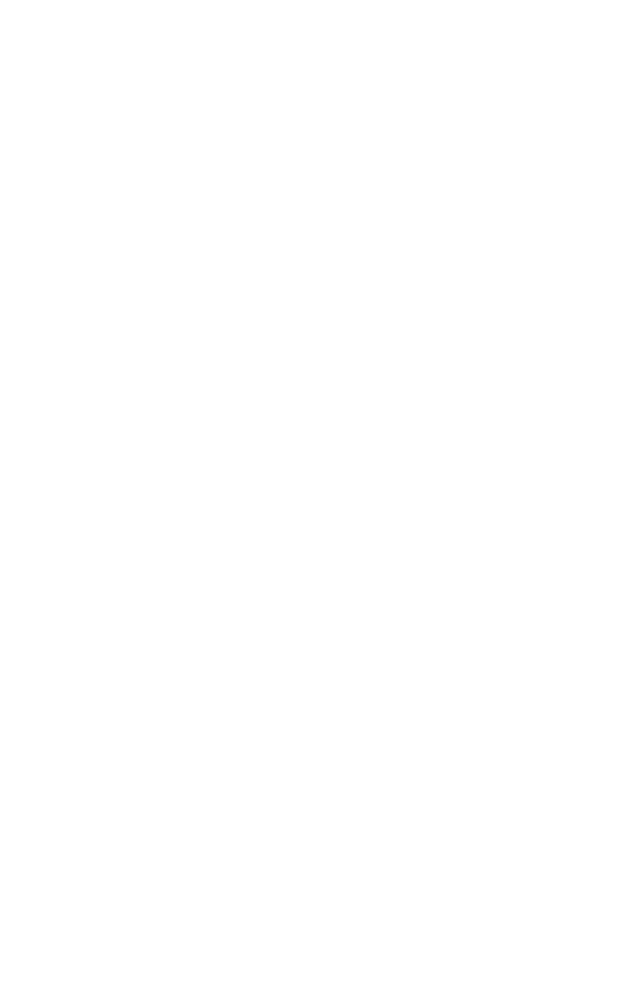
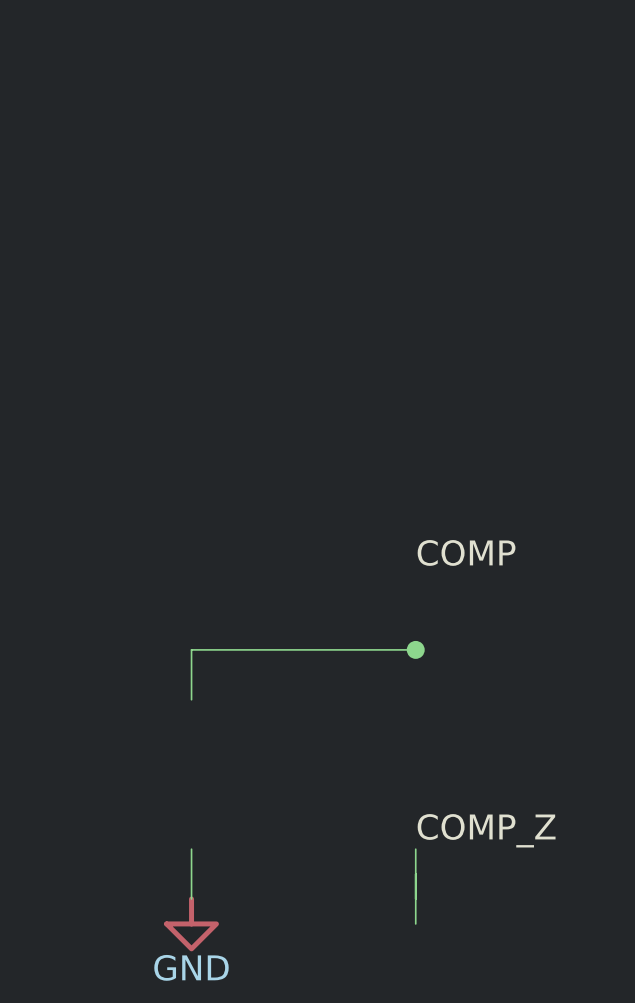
label: none -> COMP (466, 552)
wire: none -> (415, 649) (191, 649) (191, 699)
junction: none -> (415, 649)
label: none -> COMP_Z (486, 830)
wire: none -> (191, 849) (191, 899)
wire: none -> (415, 849) (415, 923)
power symbol: none -> GND (191, 923)

